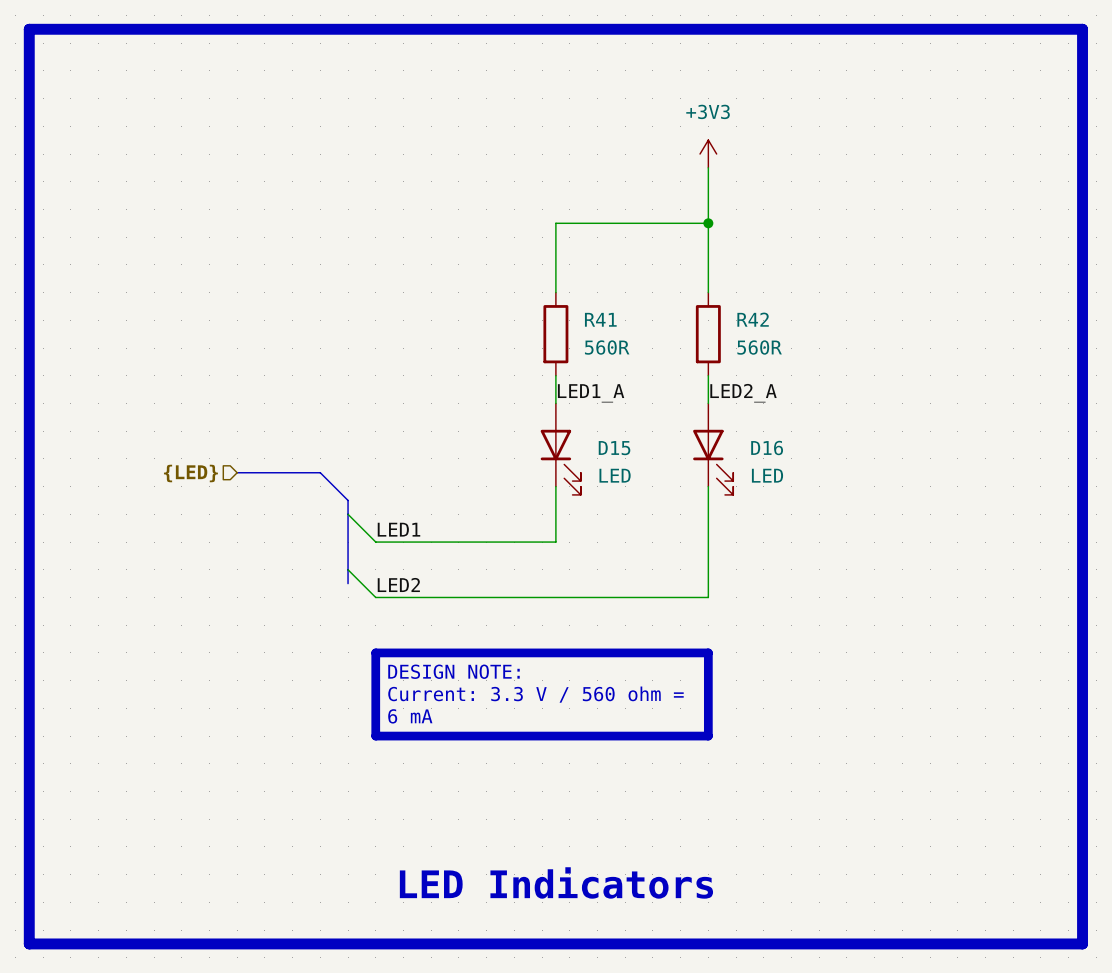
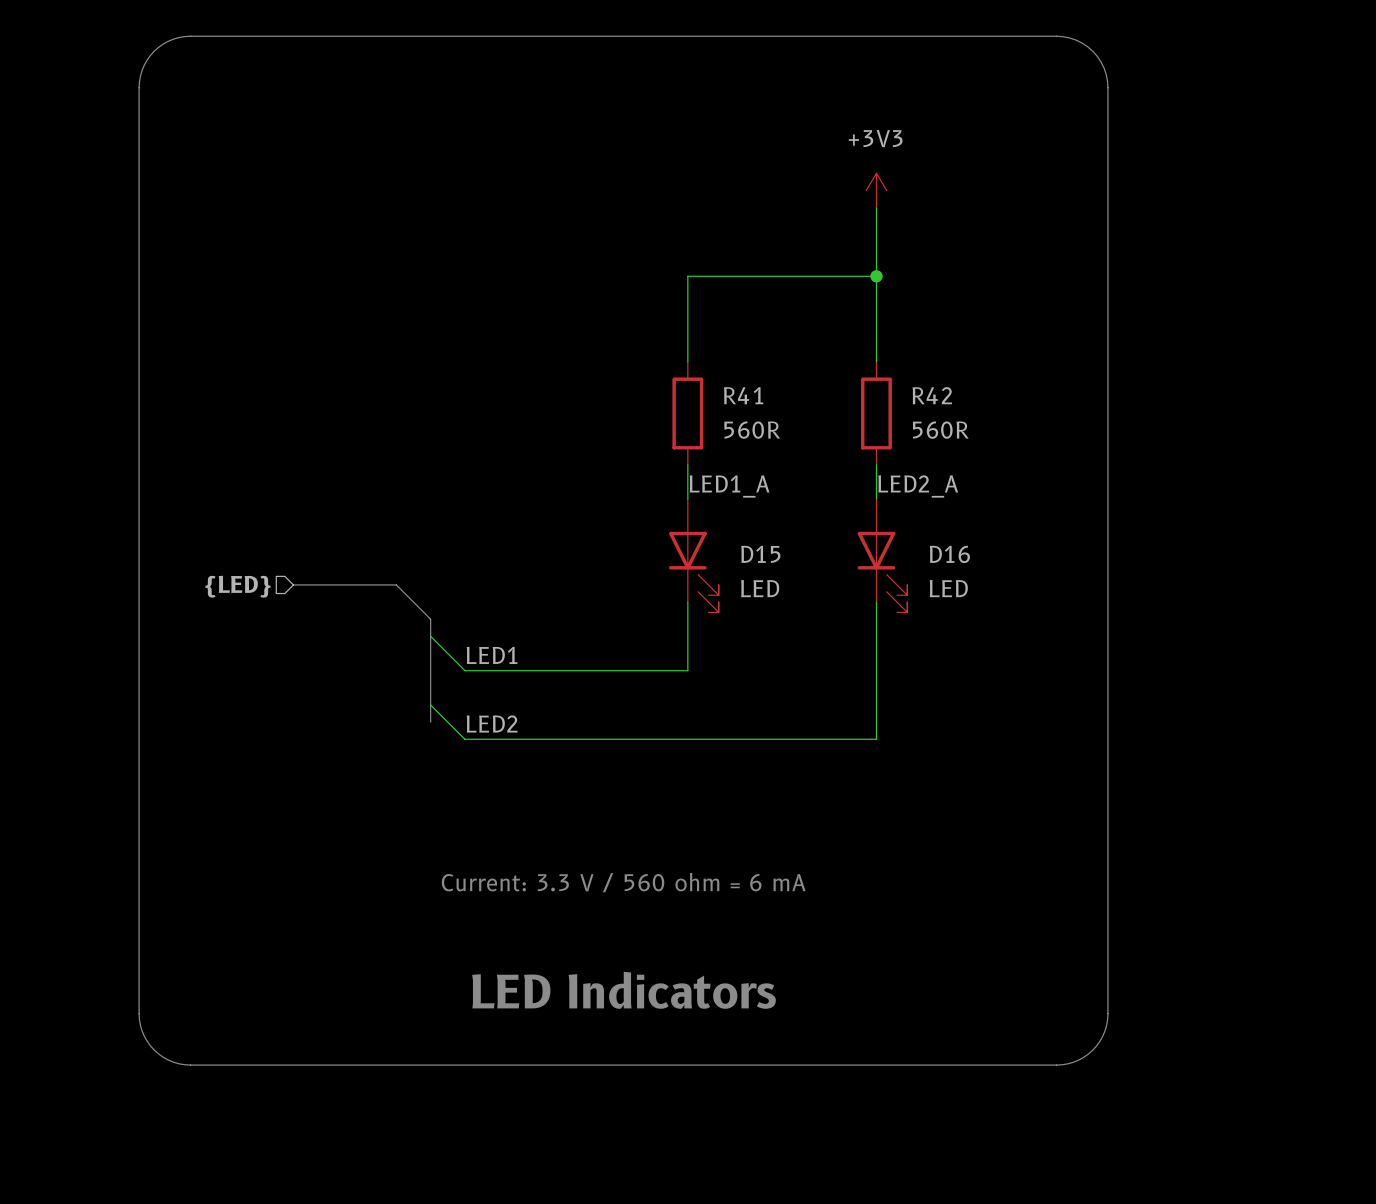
line: (154, 29) (29, 29) (29, 943) (1082, 943) (1082, 29) (853, 29) -> (190, 36) (173, 39) (154, 51) (144, 65) (139, 87) (139, 1013) (144, 1035) (154, 1050) (168, 1060) (190, 1065) (1056, 1065) (1078, 1060) (1096, 1045) (1105, 1030) (1107, 1013) (1107, 87) (1104, 67) (1092, 51) (1076, 40) (1056, 36)
line width: thick (154, 29) (853, 29) -> thin (190, 36) (1056, 36)
line: (375, 652) (708, 652) (708, 736) (375, 736) (375, 652) -> none
text: DESIGN NOTE: (453, 671) -> none
text: Current: 3.3 V / 560 ohm = (535, 694) -> Current: 3.3 V / 560 ohm = 6 mA (623, 882)
text: 6 mA (410, 716) -> none
text position: LED Indicators (556, 882) -> LED Indicators (624, 990)

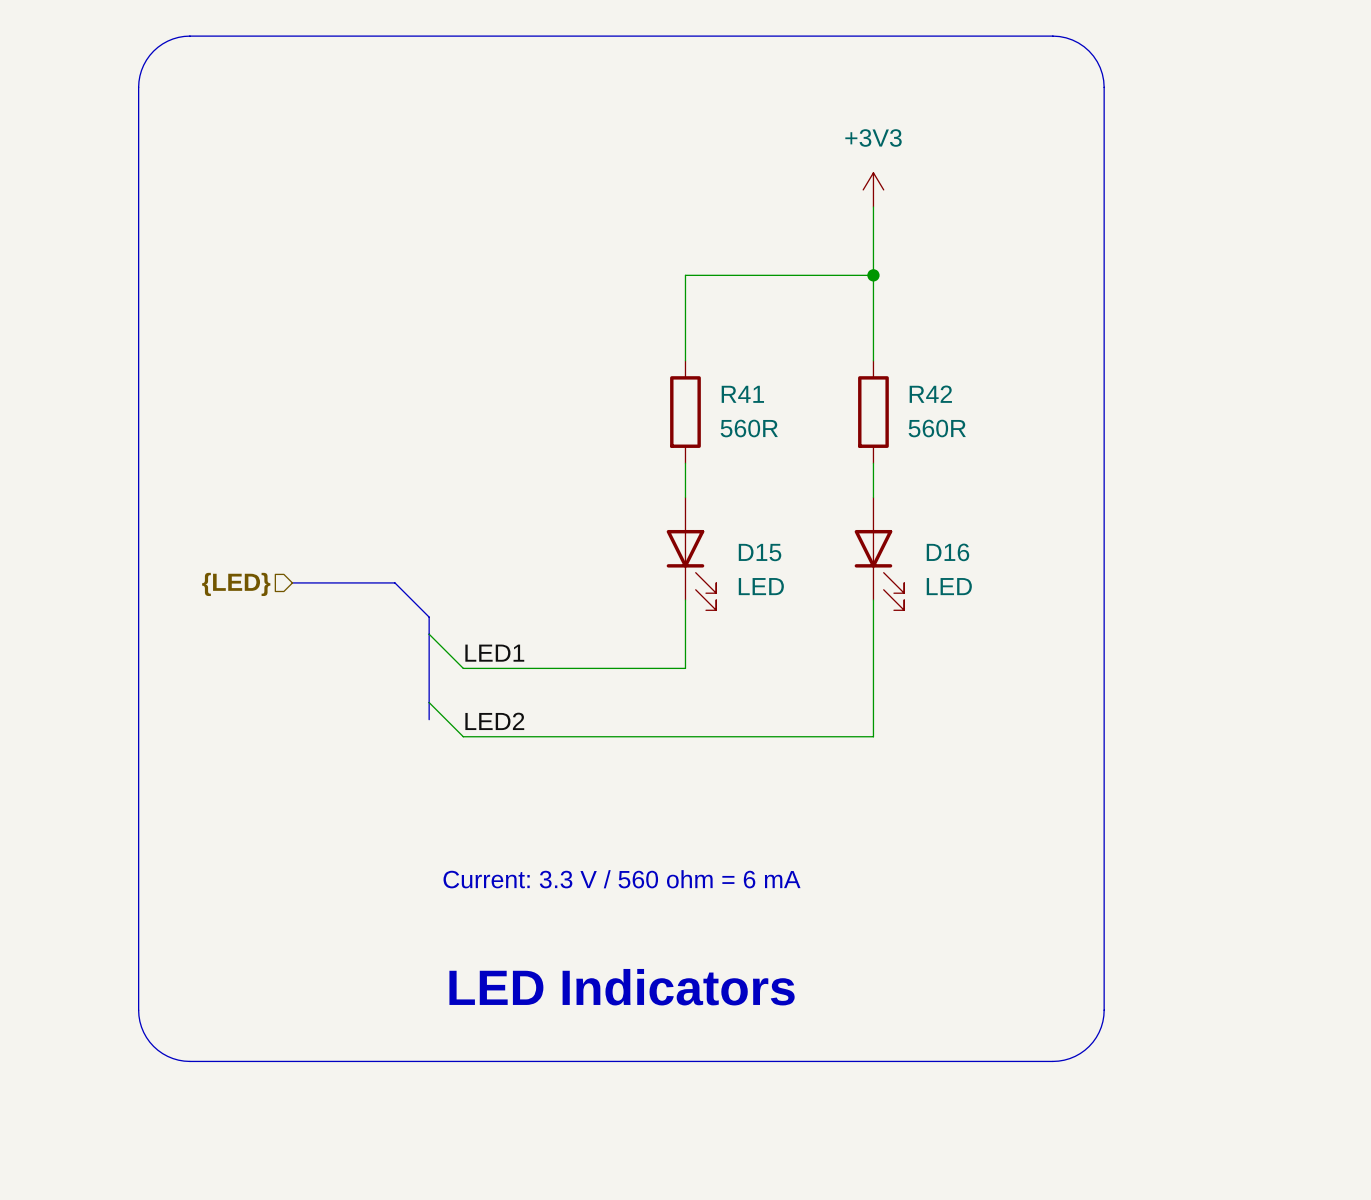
label: LED1_A (729, 486) -> none
label: LED2_A (918, 486) -> none

